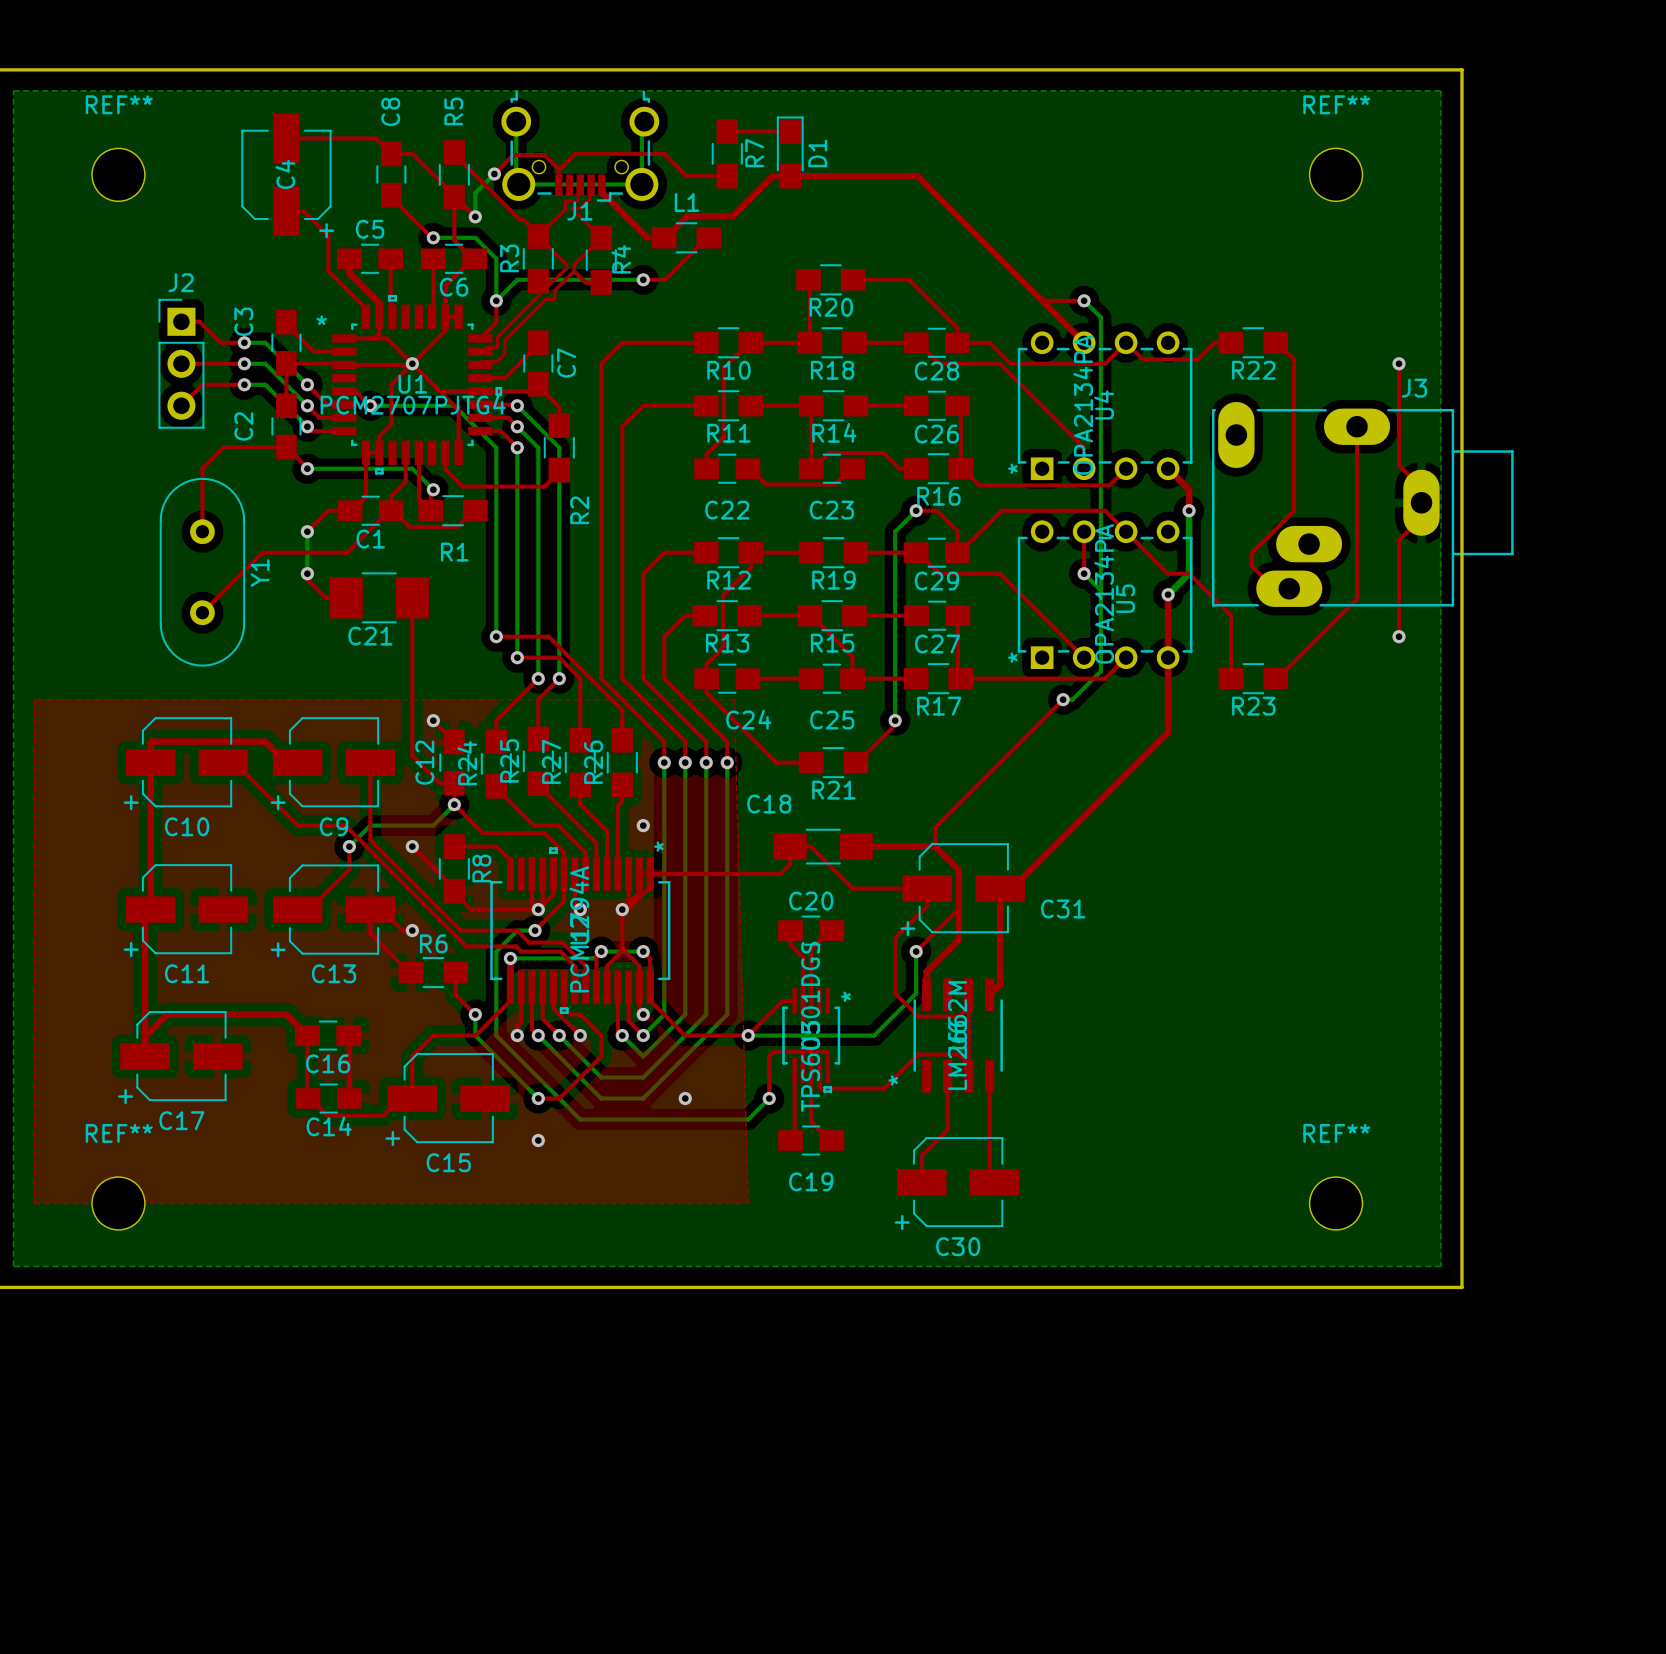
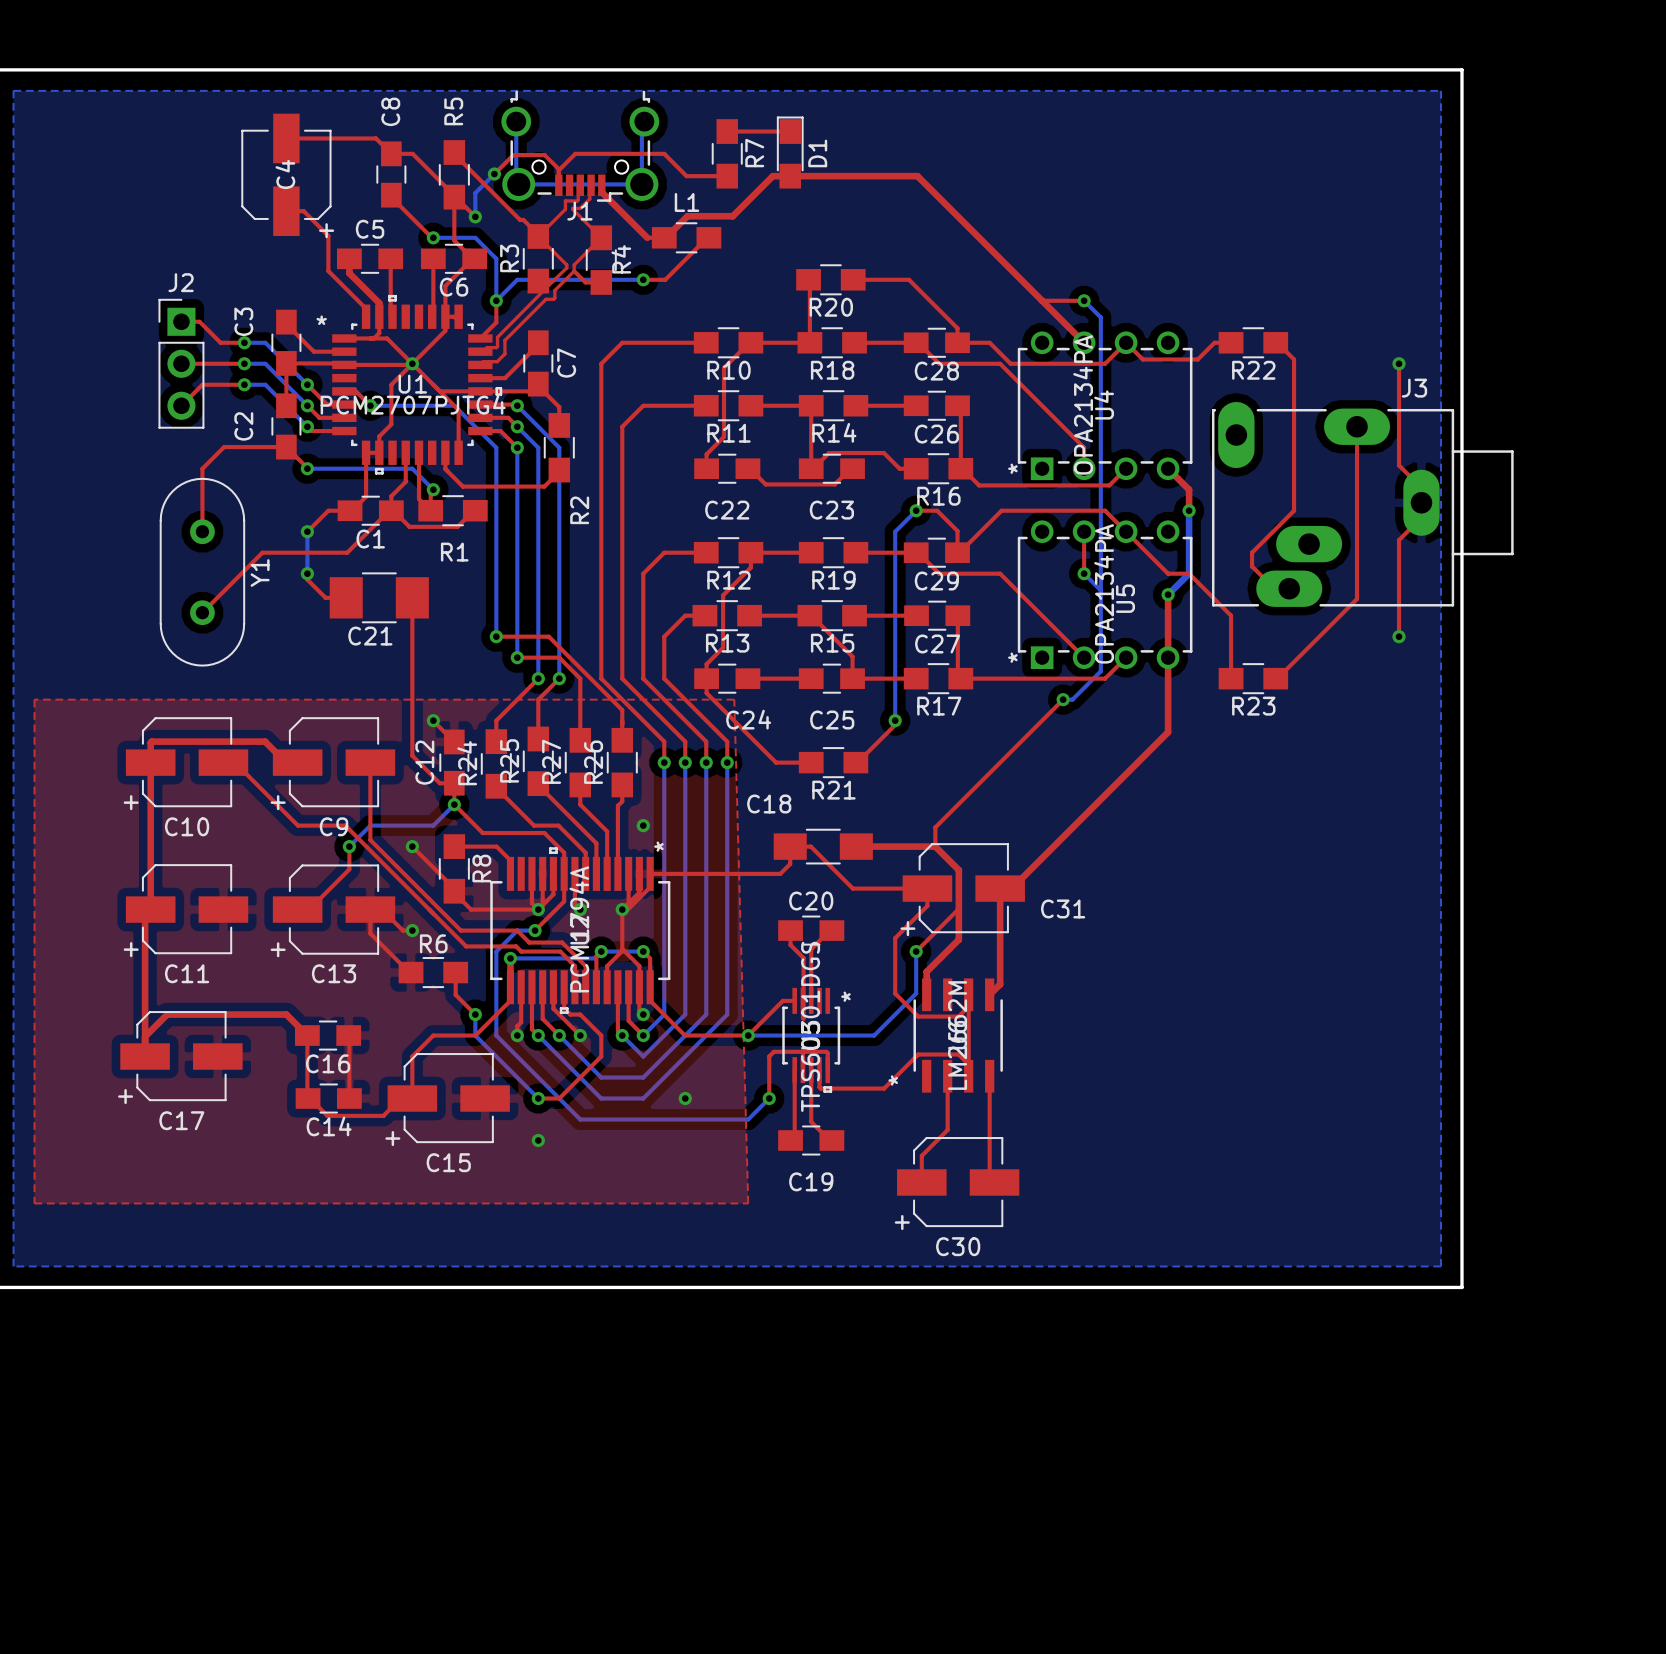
REF**: (118, 174) -> none
REF**: (1336, 174) -> none
REF**: (118, 1203) -> none
REF**: (1336, 1203) -> none

